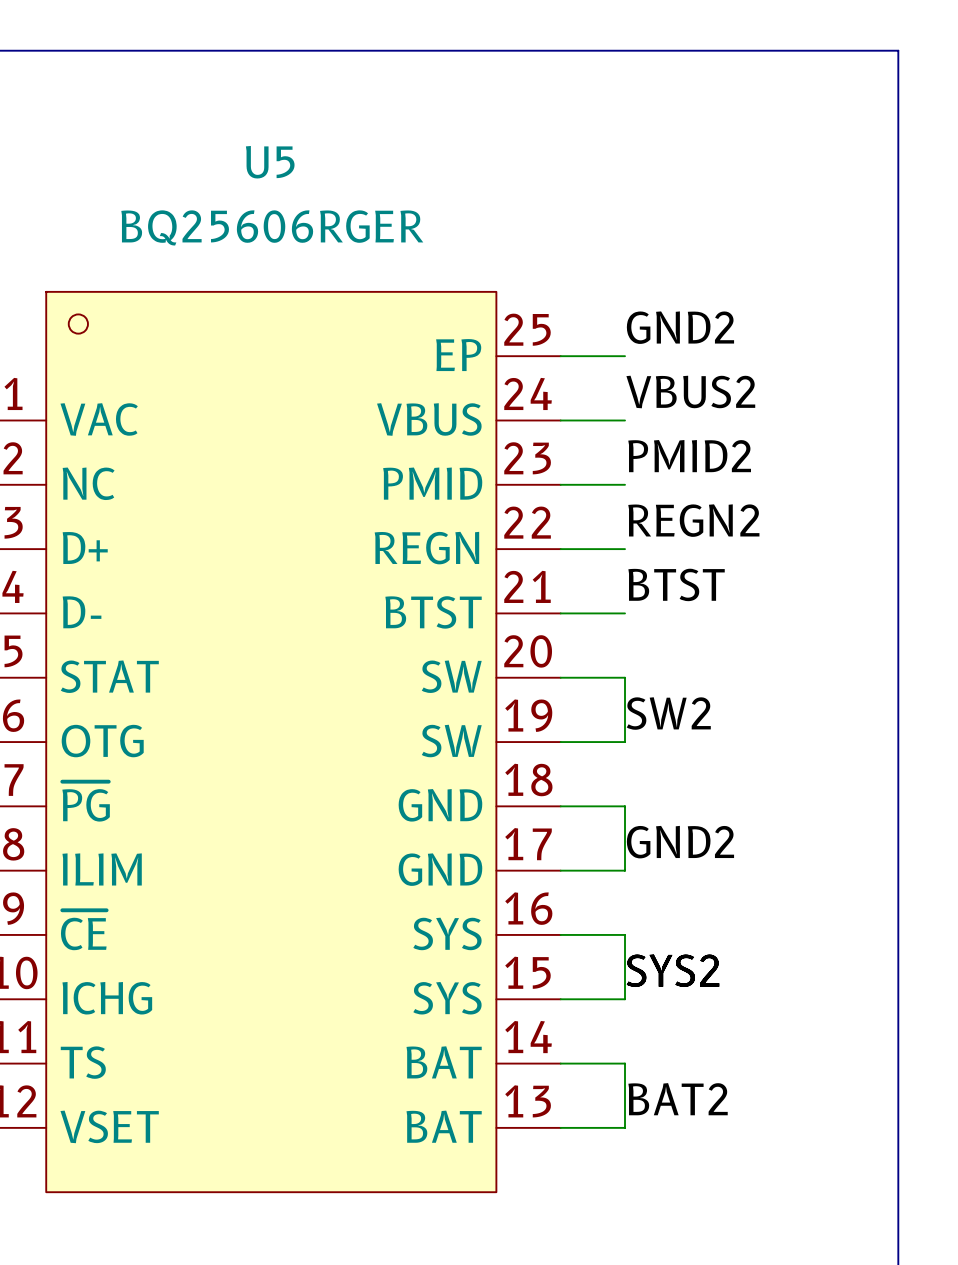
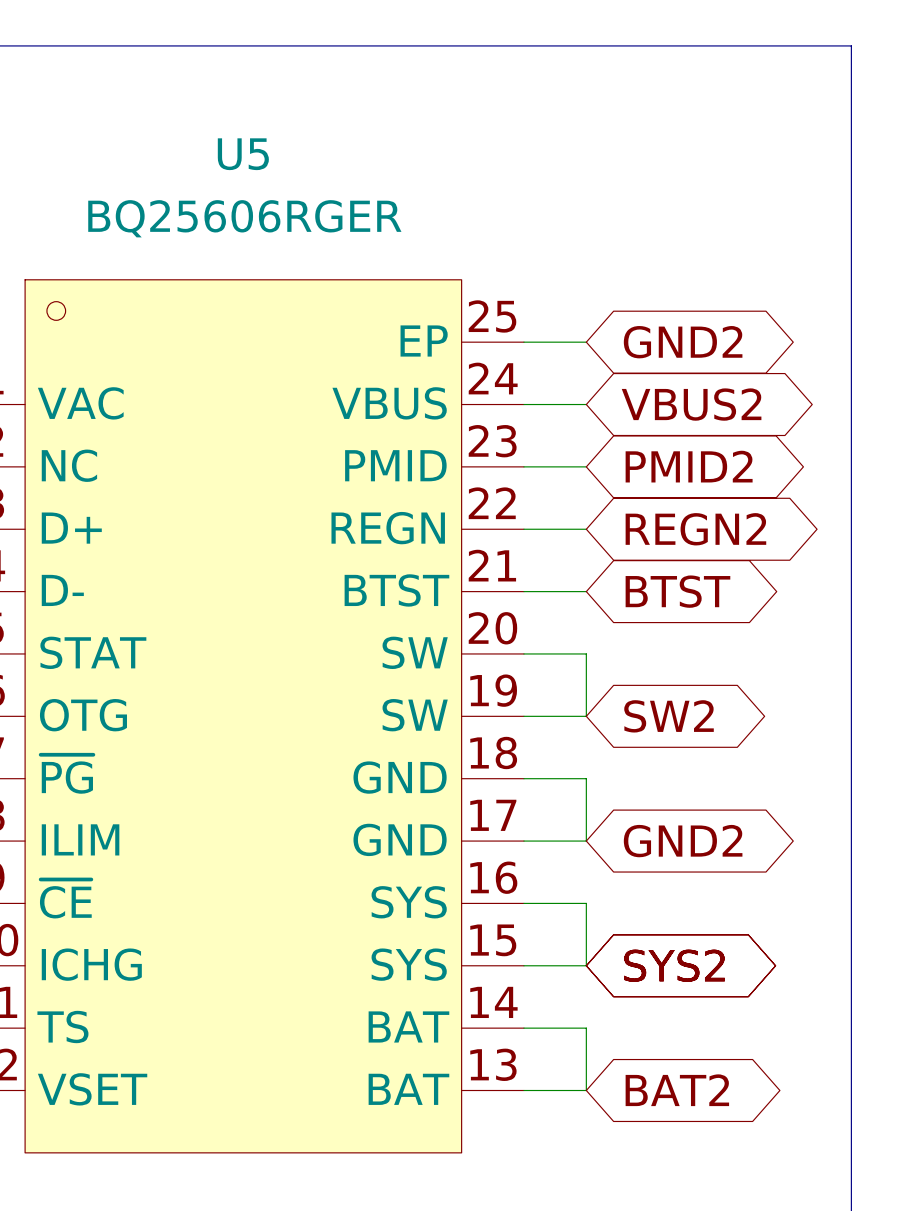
label: GND2 (680, 327) -> none
global label: none -> GND2 (683, 342)
label: VBUS2 (690, 392) -> none
global label: none -> VBUS2 (691, 404)
label: PMID2 (689, 456) -> none
global label: none -> PMID2 (689, 466)
label: REGN2 (693, 520) -> none
global label: none -> REGN2 (695, 529)
label: BTST (676, 584) -> none
global label: none -> BTST (677, 591)
label: SW2 (668, 713) -> none
global label: none -> SW2 (669, 716)
label: GND2 (680, 842) -> none
global label: none -> GND2 (683, 841)
label: SYS2 (673, 970) -> none
global label: none -> SYS2 (674, 965)
label: BAT2 (678, 1099) -> none
global label: none -> BAT2 (677, 1090)

